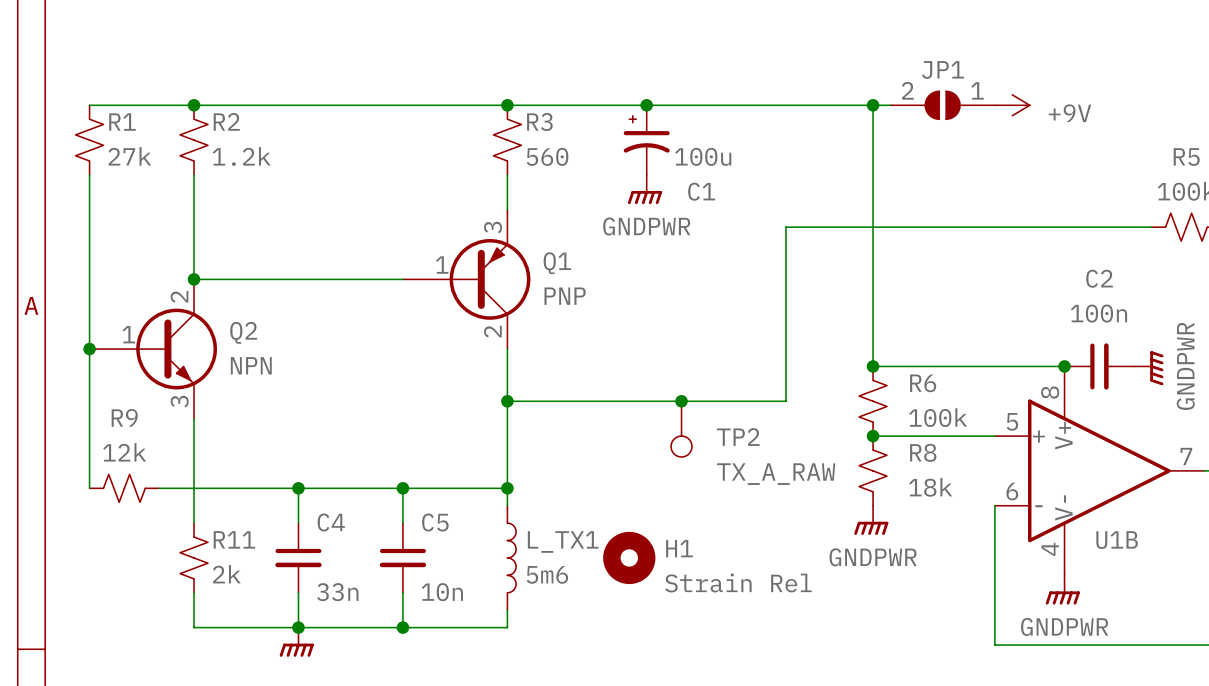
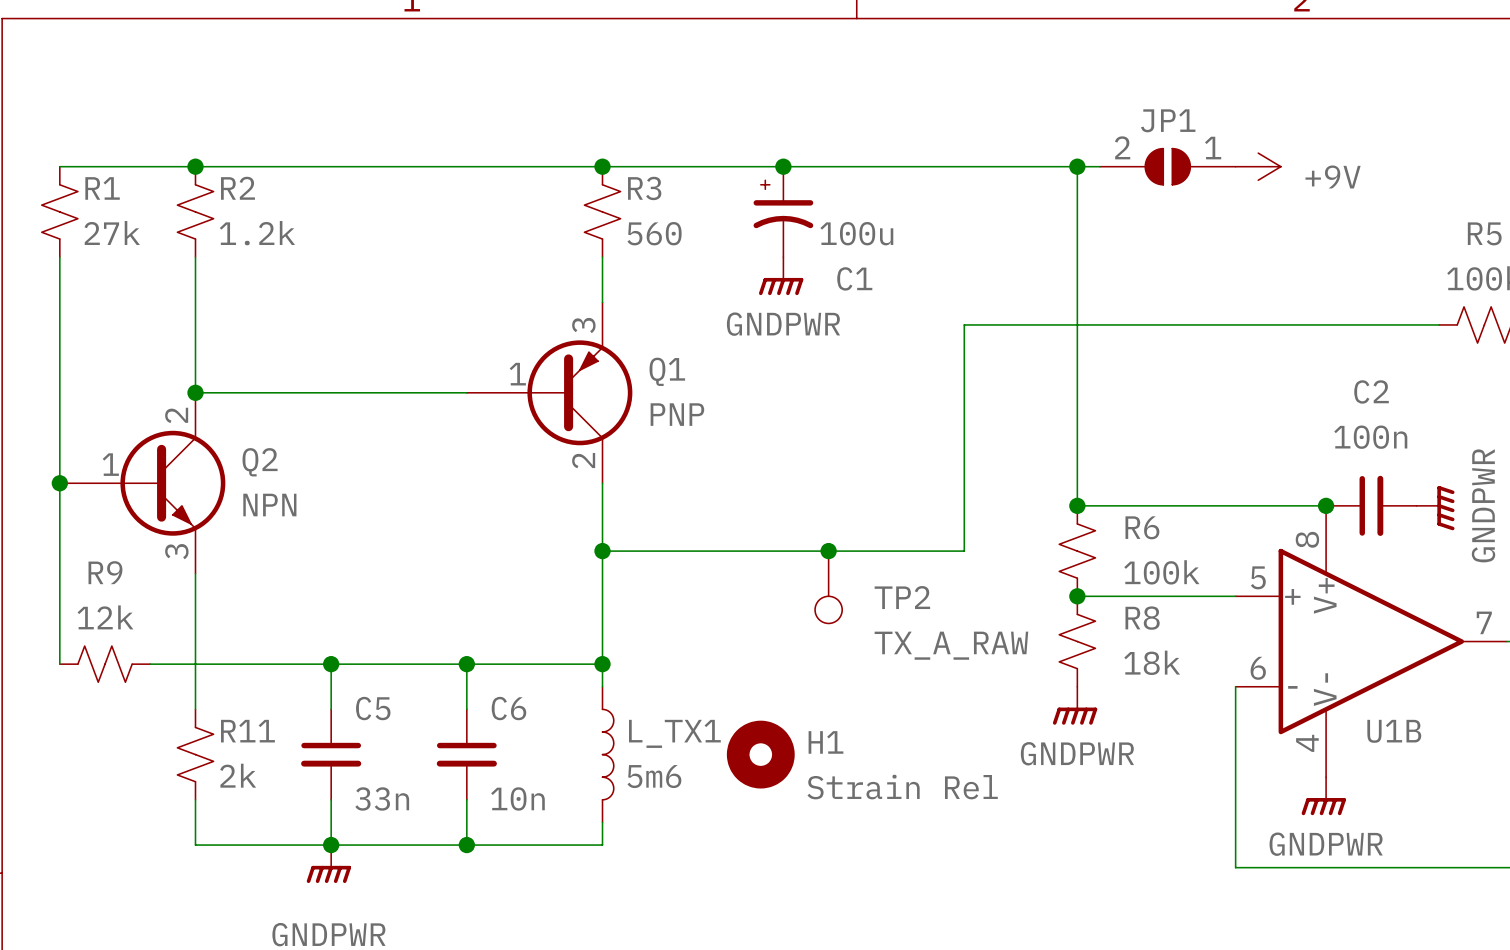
C4 name: C4 (331, 522) -> C5 (373, 708)
C5 name: C5 (435, 522) -> C6 (508, 708)

